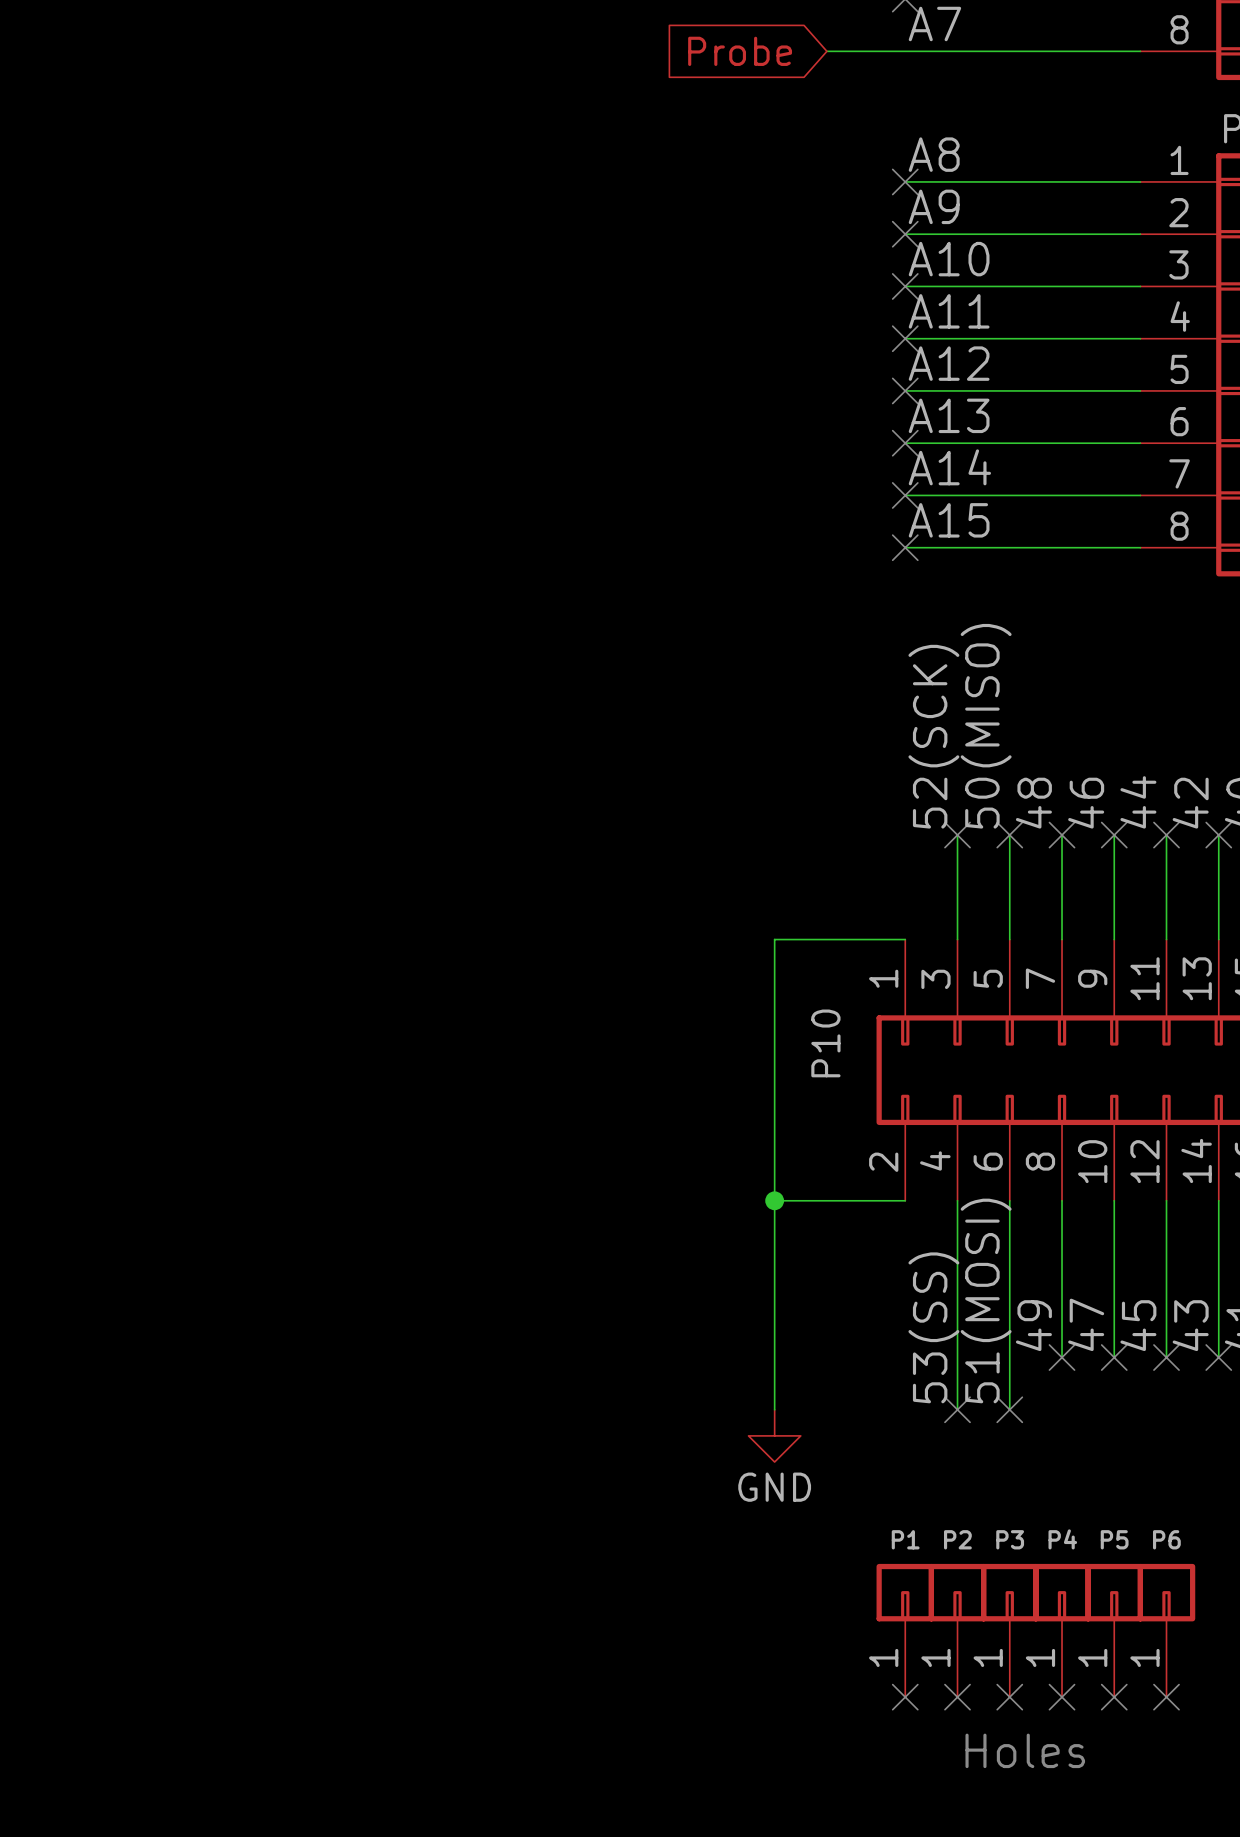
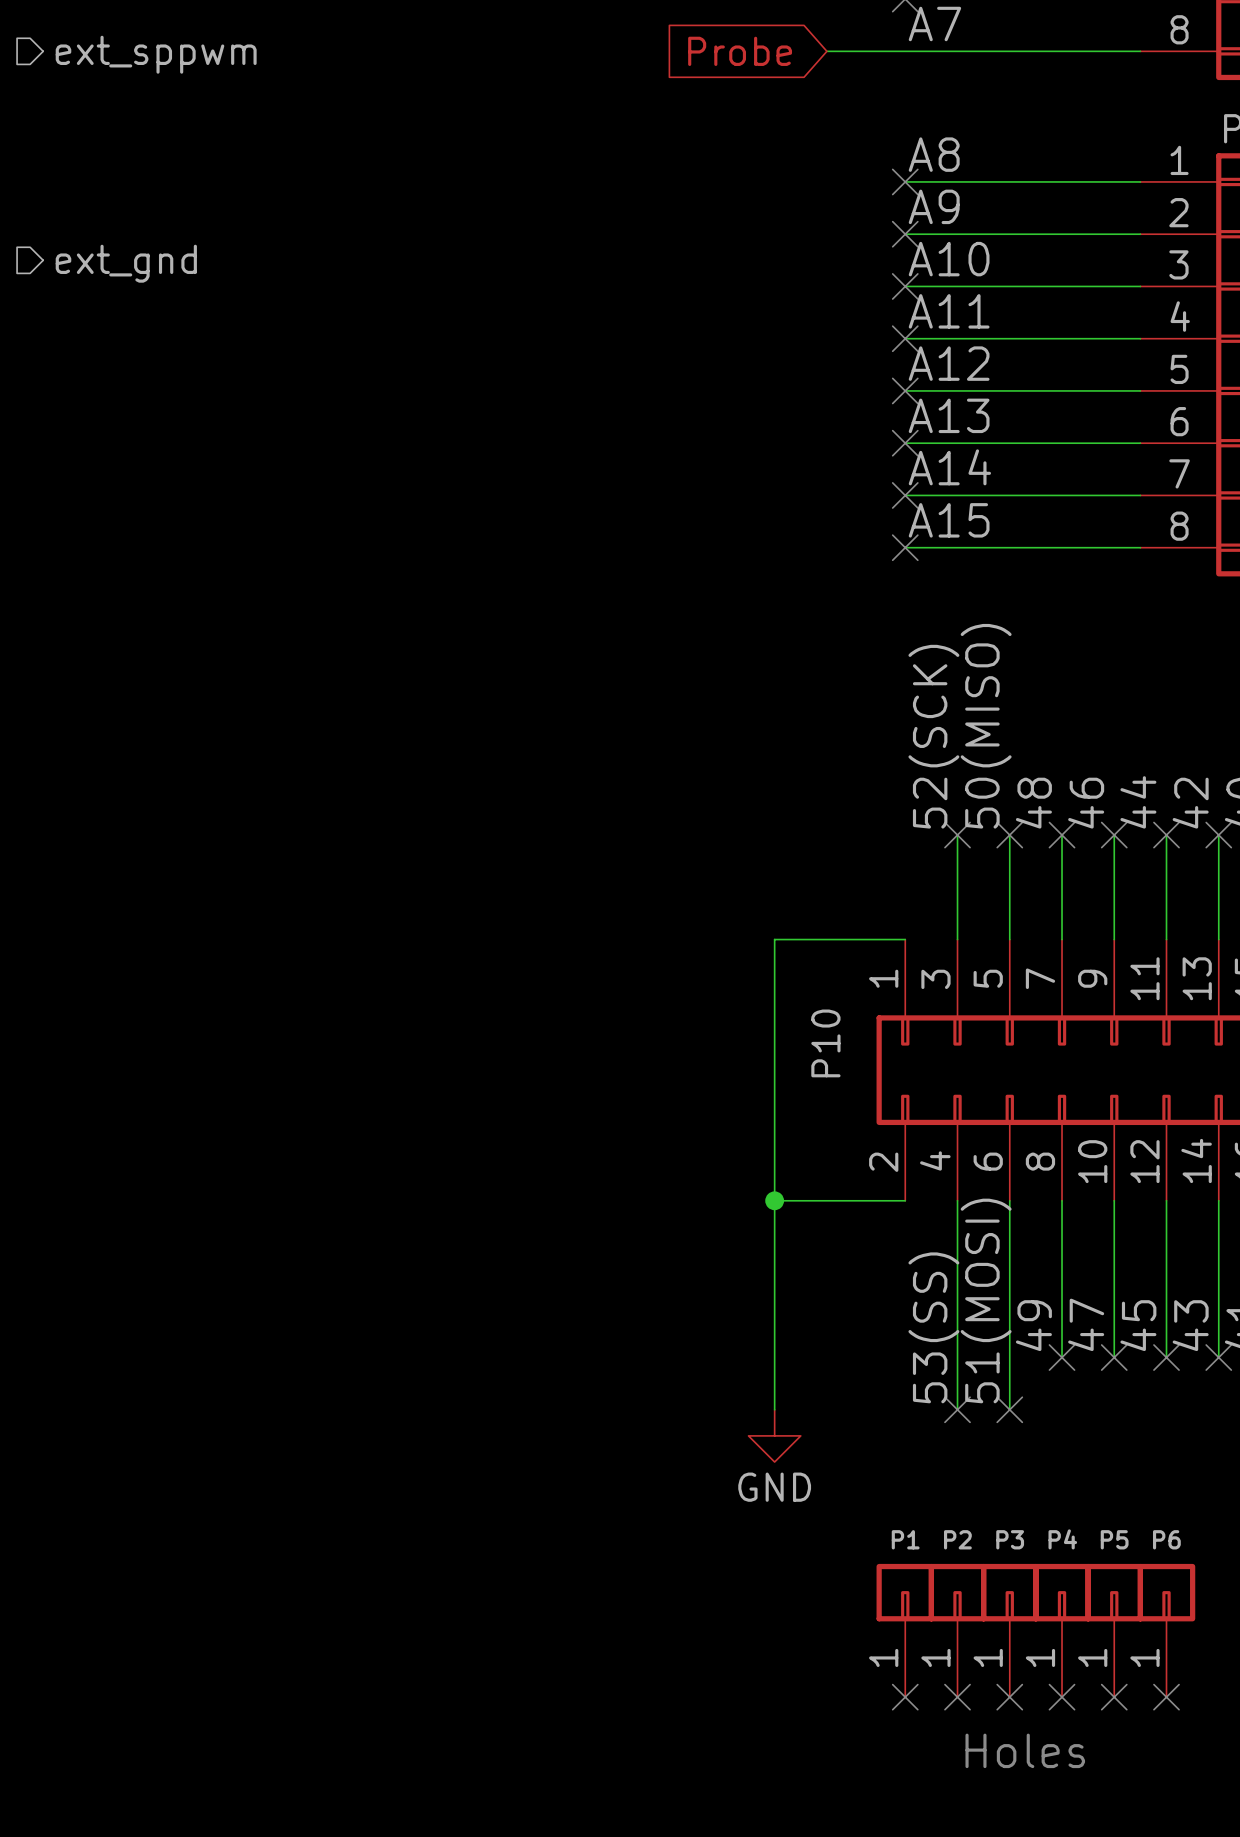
sheet pin: none -> ext_sppwm (156, 54)
sheet pin: none -> ext_gnd (126, 263)

